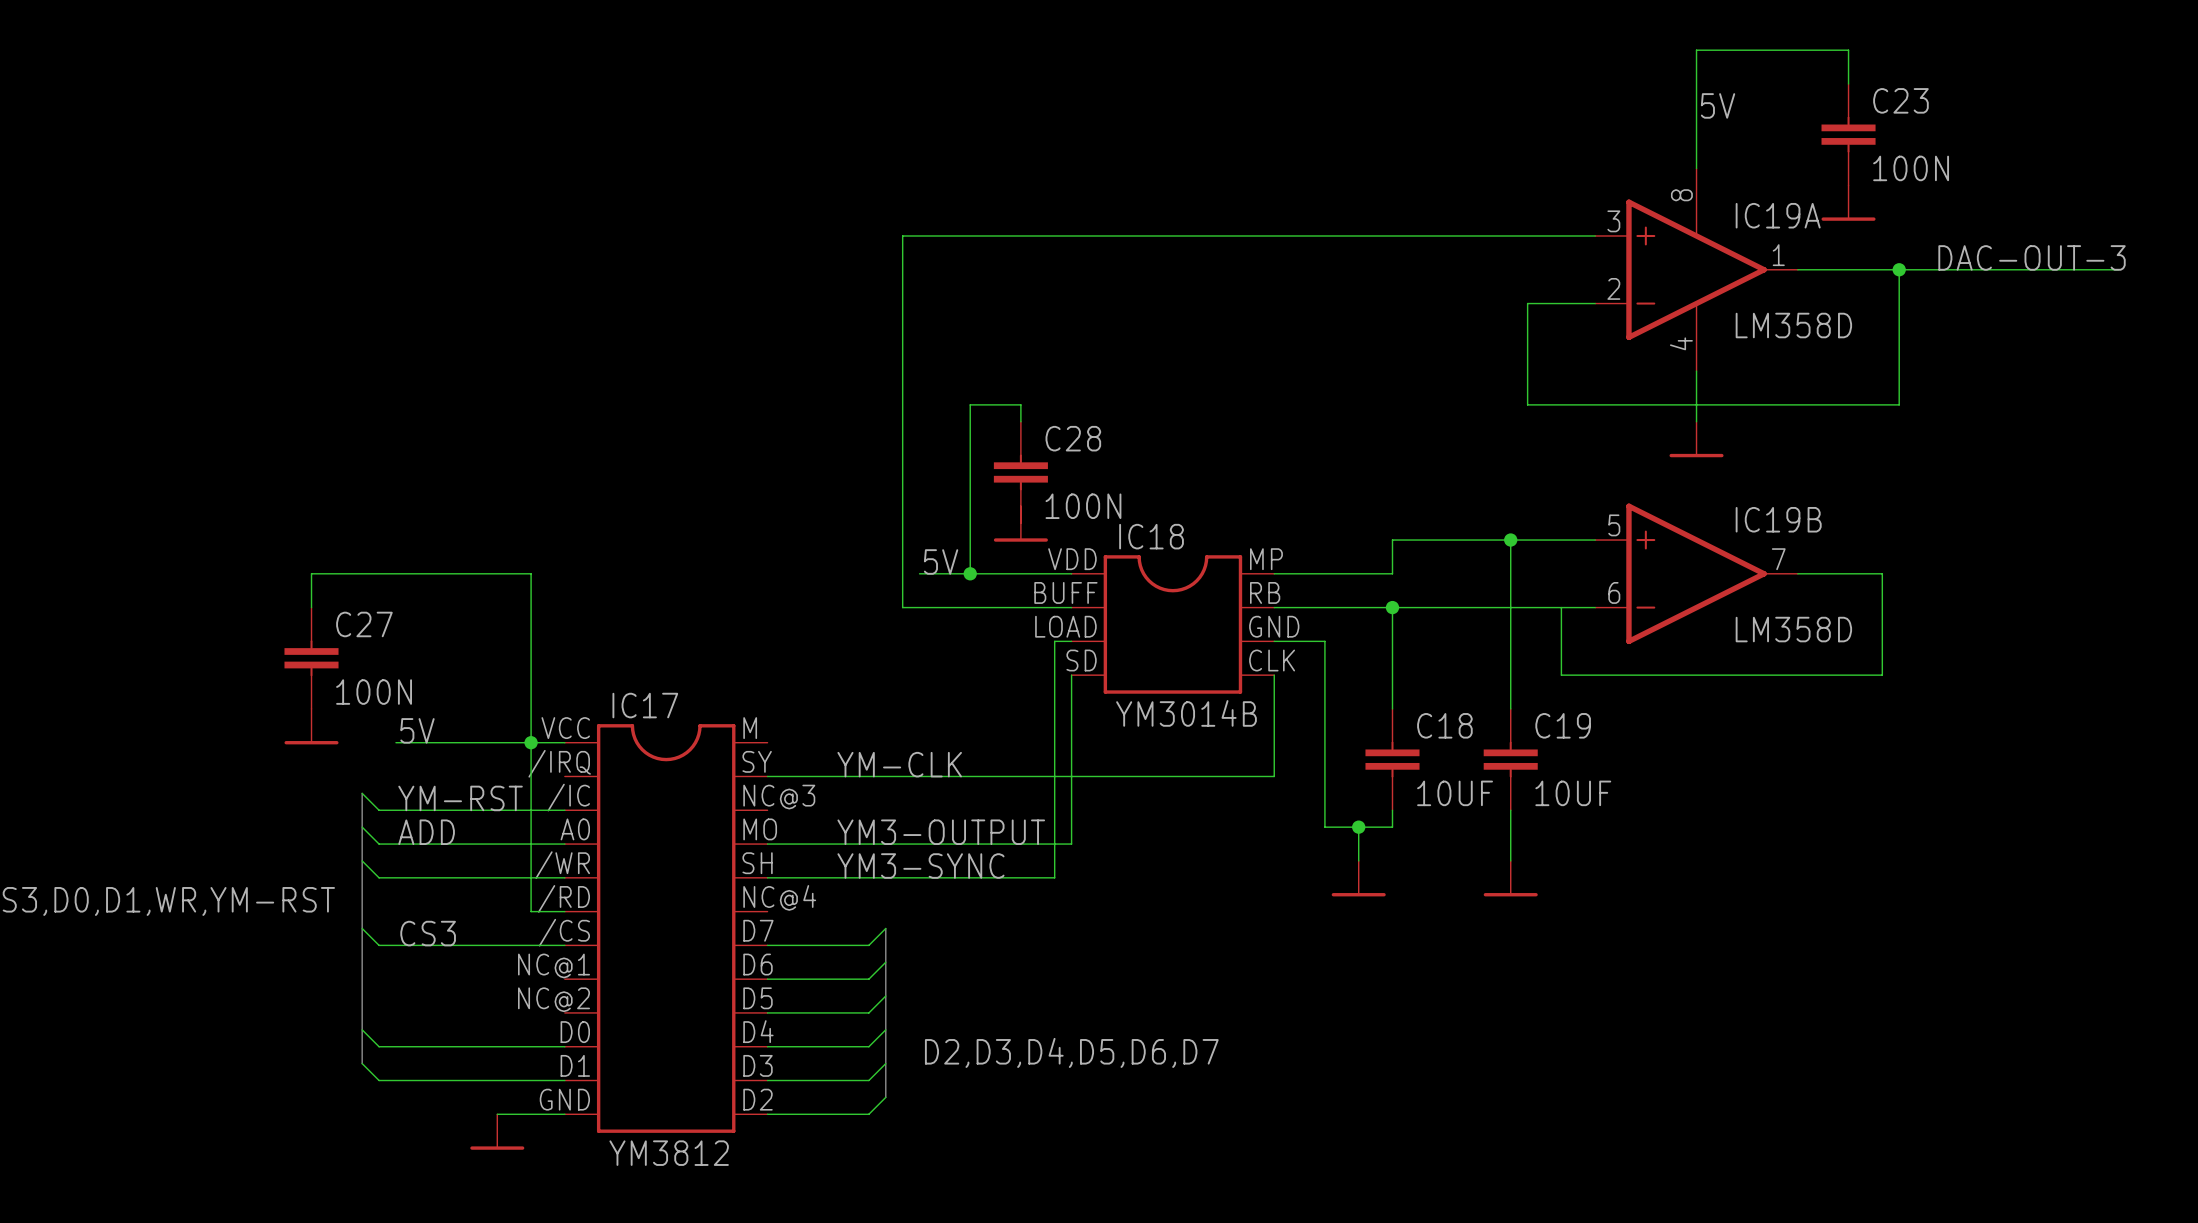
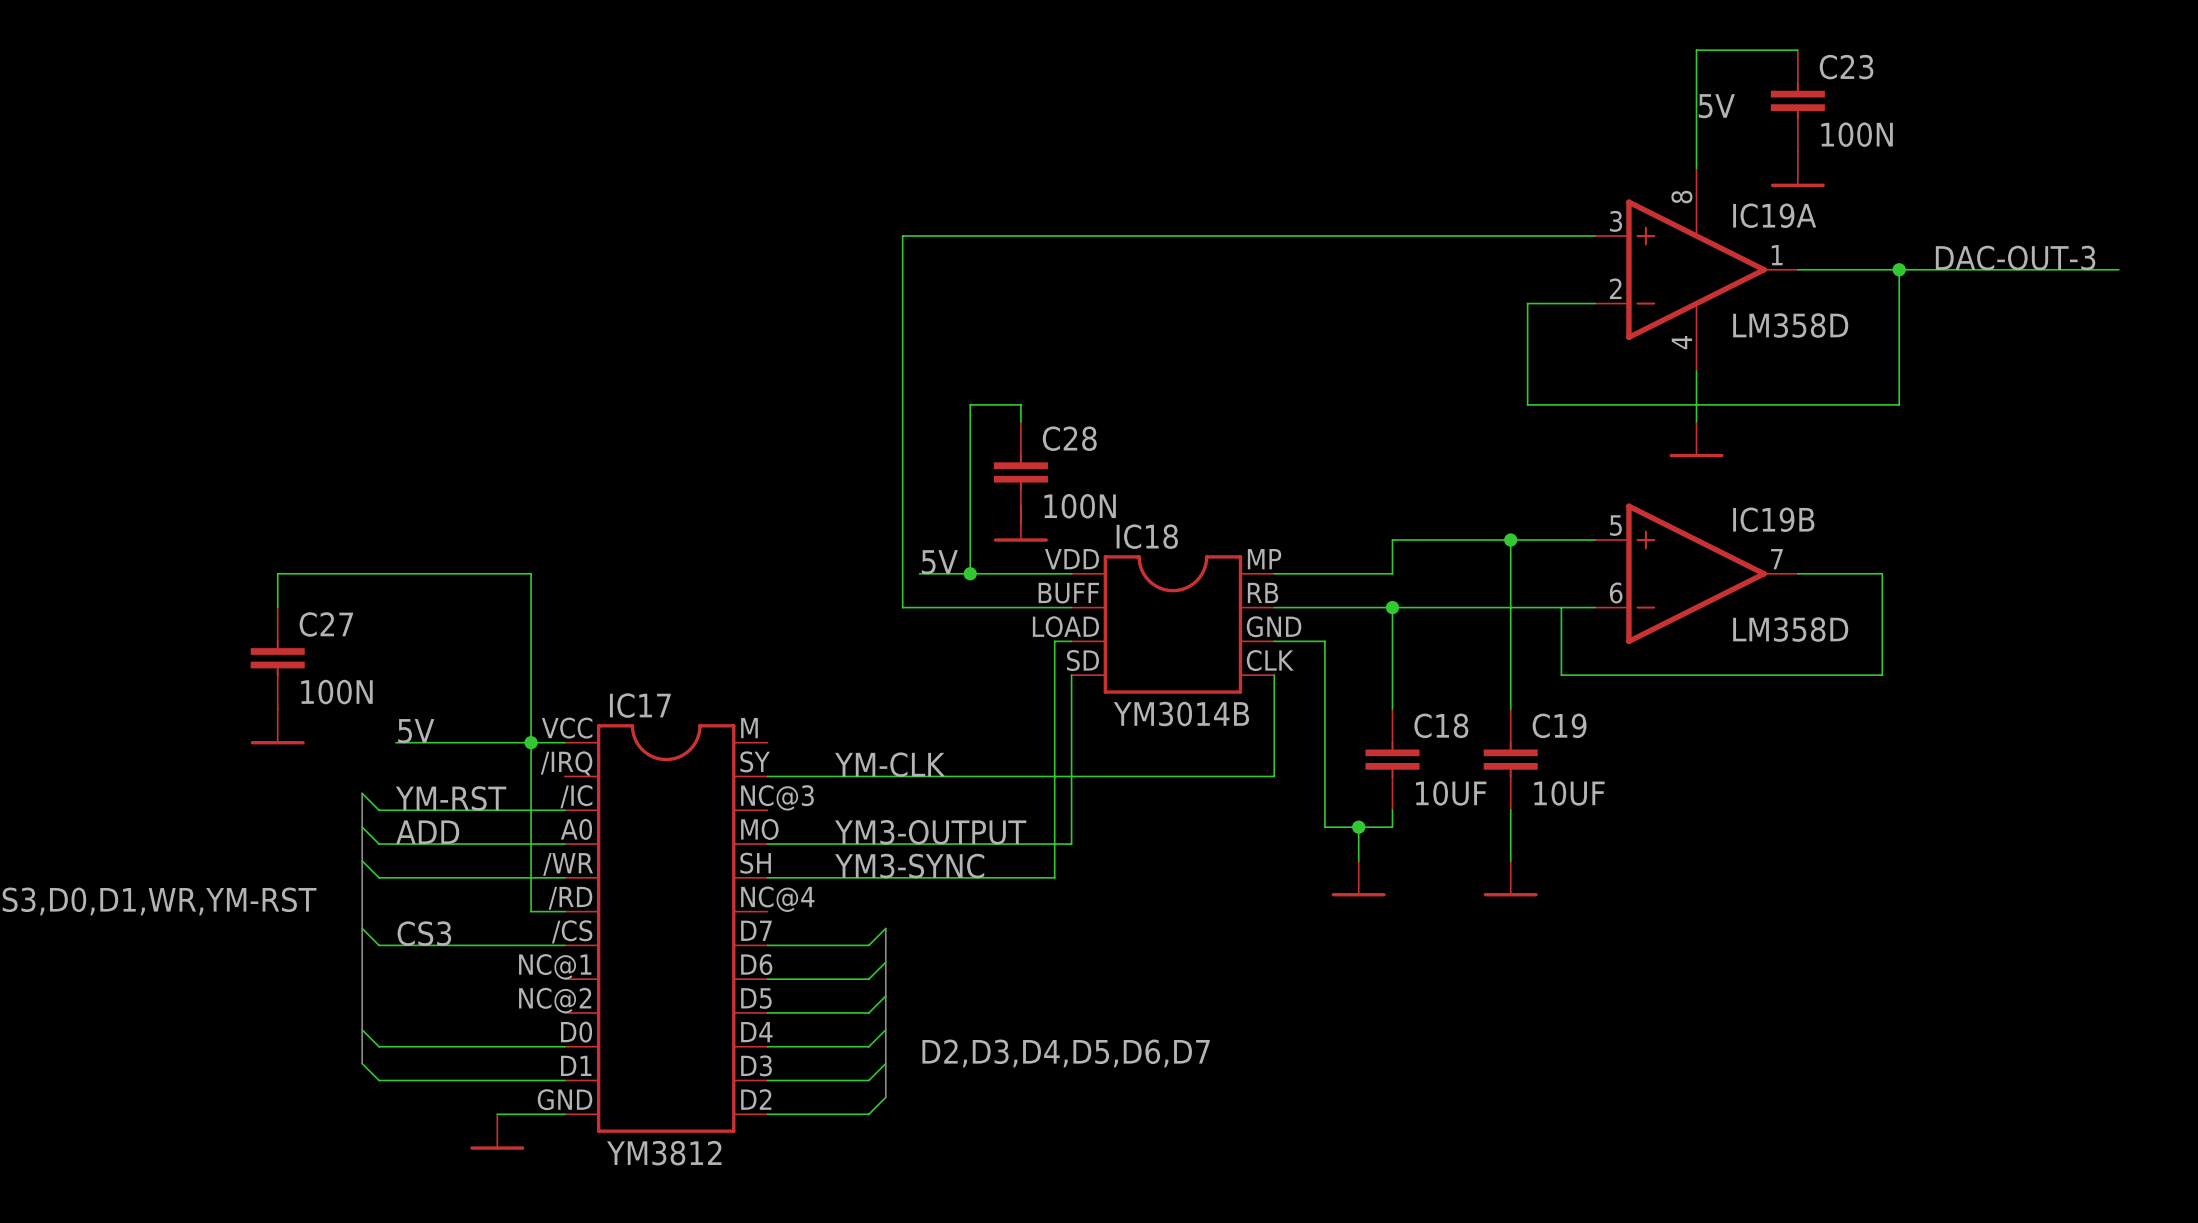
wire: (1797, 50) (1848, 50) (1848, 83) -> none
C23 position: (1848, 134) -> (1797, 100)
power symbol position: (1848, 203) -> (1797, 169)
wire: (311, 573) (311, 607) -> (311, 573) (277, 573) (277, 607)
C27 position: (311, 658) -> (277, 658)
power symbol position: (311, 726) -> (277, 726)

